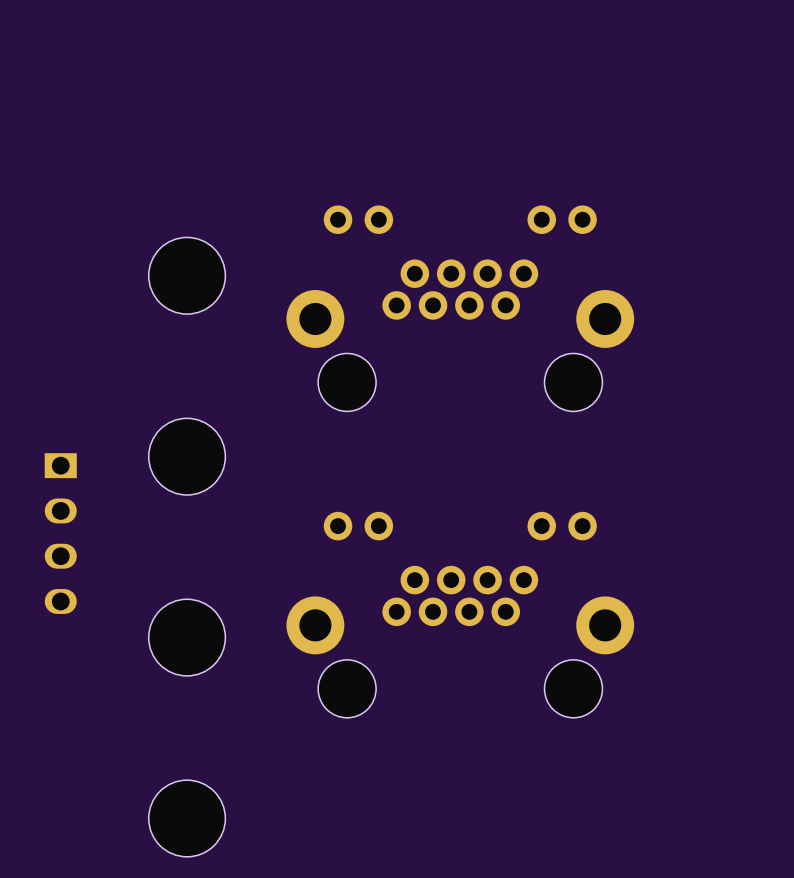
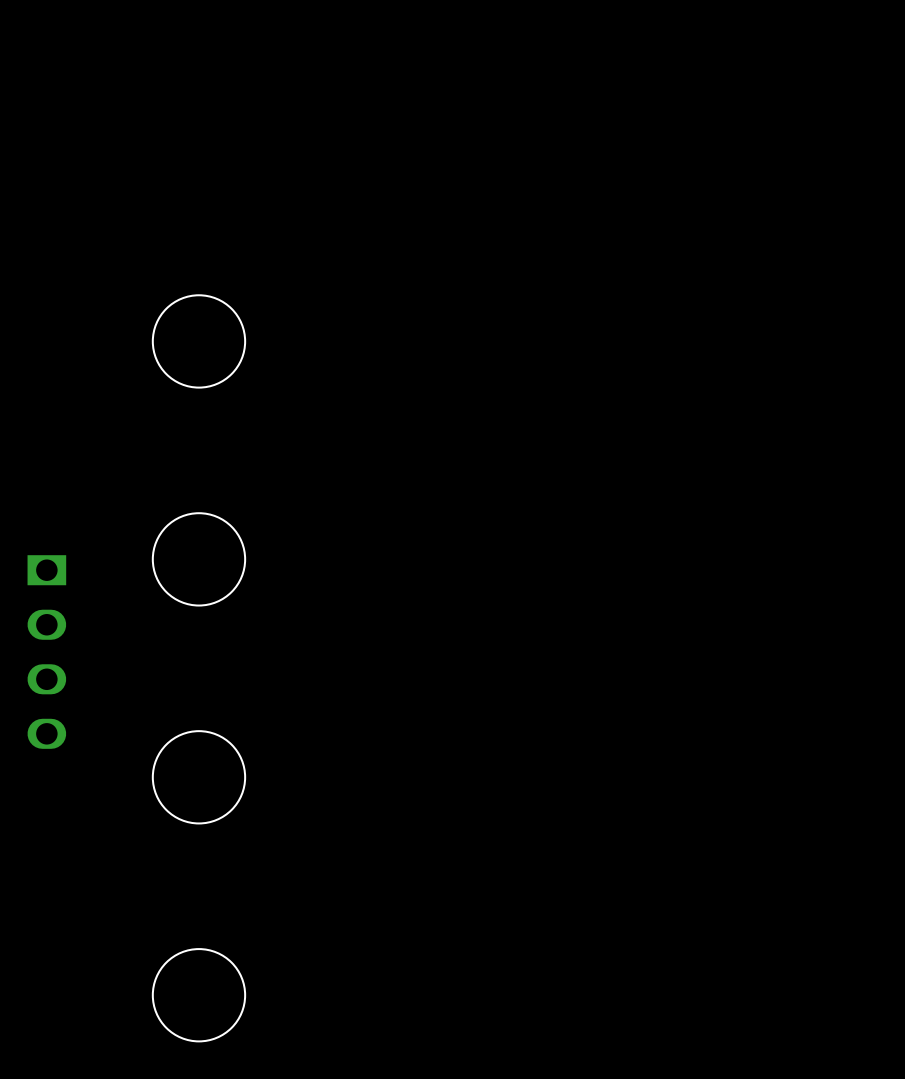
part: (460, 308) -> none
part: (460, 614) -> none

